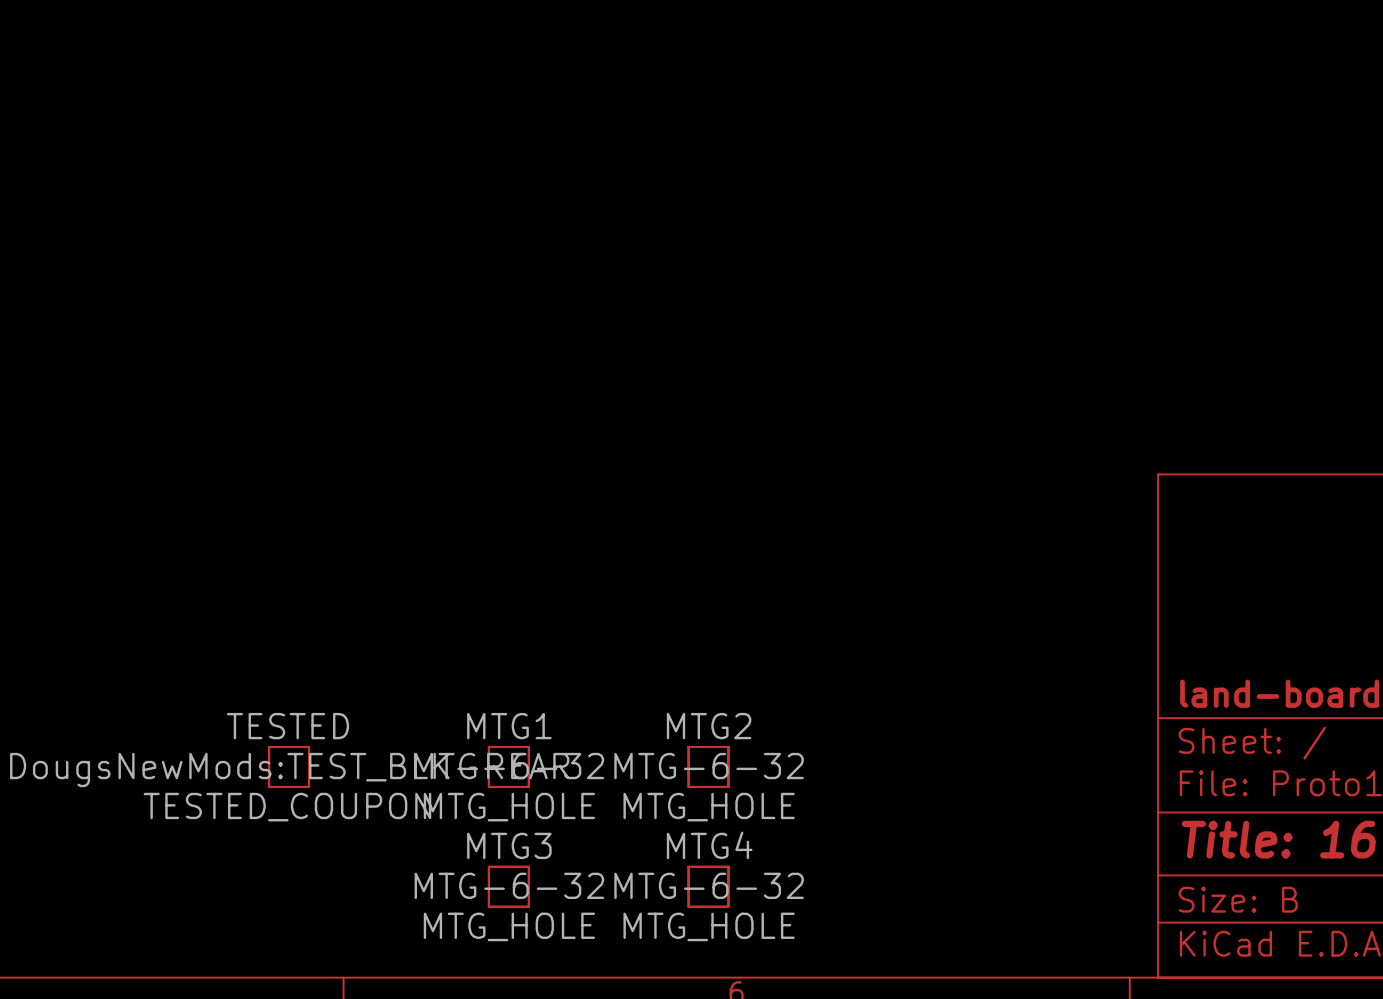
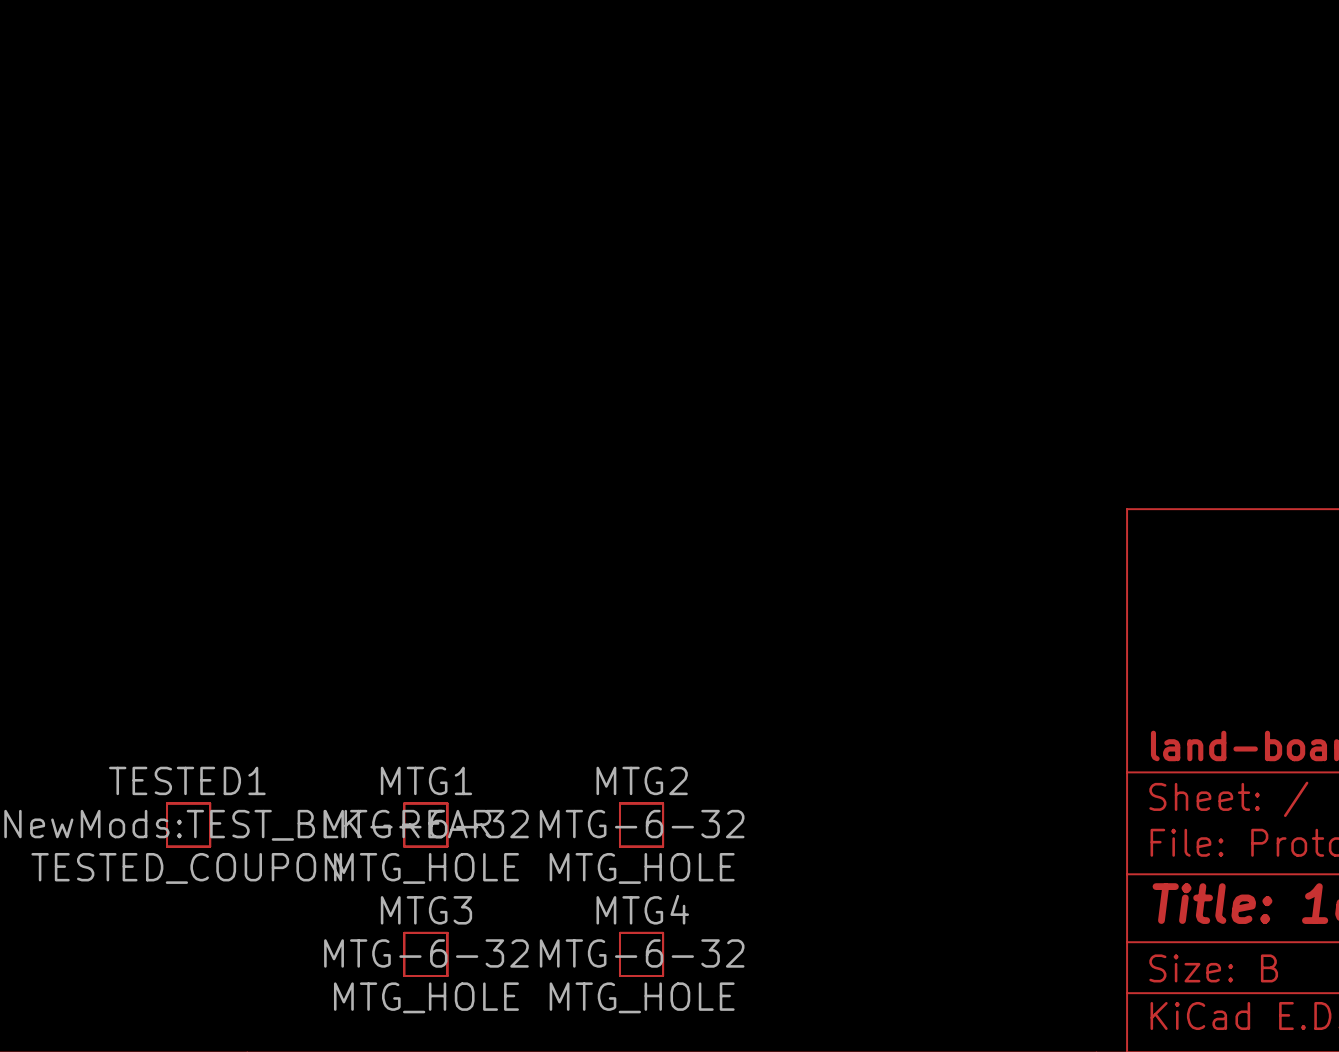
TESTED name: TESTED (288, 726) -> TESTED1 (187, 780)

